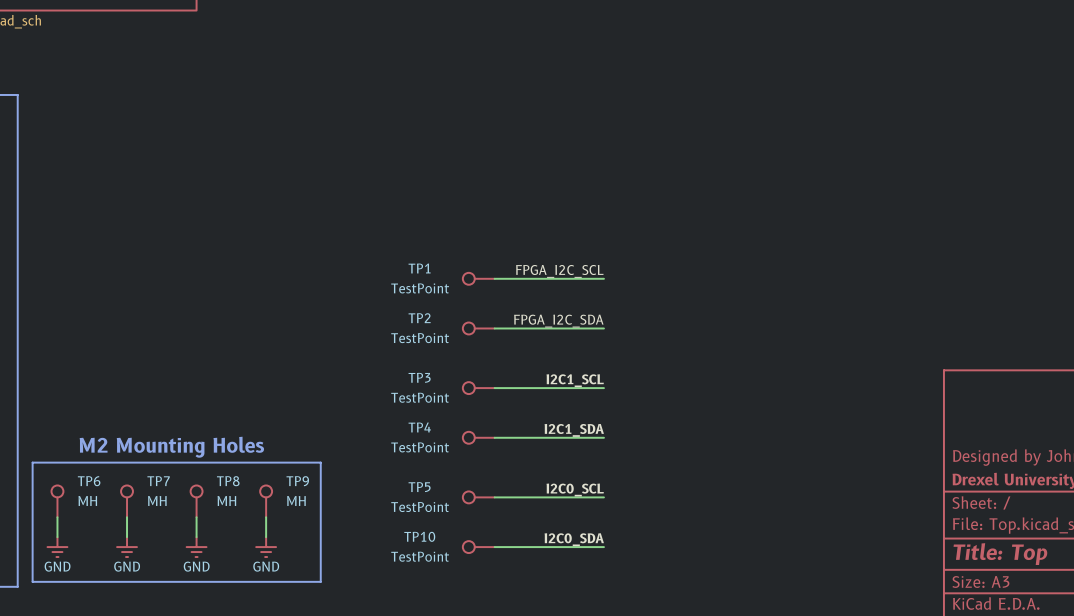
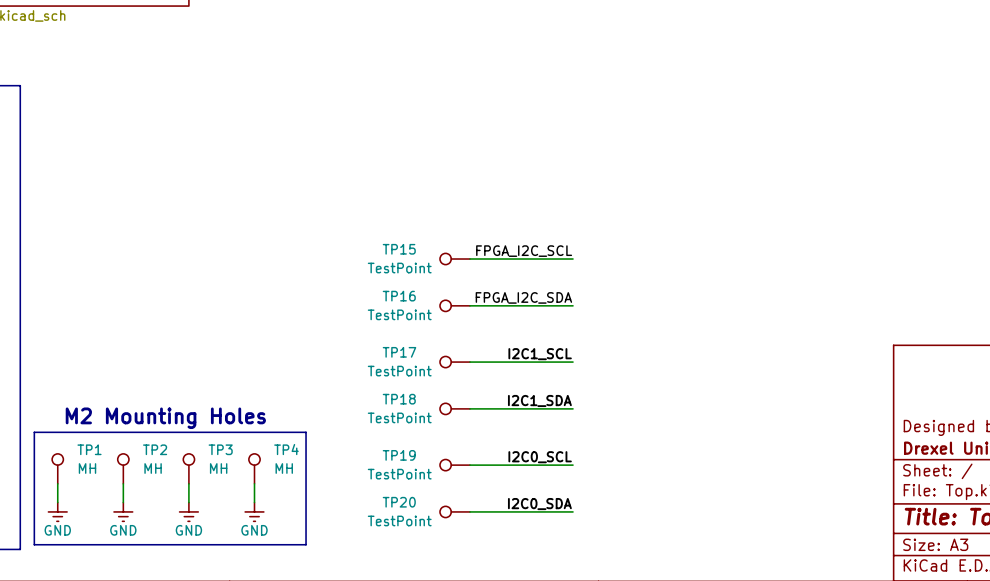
TP1 name: TP1 (419, 268) -> TP15 (399, 249)
TP2 name: TP2 (419, 318) -> TP16 (399, 296)
TP3 name: TP3 (419, 377) -> TP17 (399, 352)
TP4 name: TP4 (419, 427) -> TP18 (399, 399)
TP6 name: TP6 (89, 481) -> TP1 (89, 449)
TP7 name: TP7 (158, 481) -> TP2 (155, 449)
TP8 name: TP8 (228, 481) -> TP3 (220, 449)
TP9 name: TP9 (297, 481) -> TP4 (286, 449)
TP5 name: TP5 (419, 487) -> TP19 (399, 455)
TP10 name: TP10 (419, 536) -> TP20 (399, 502)

